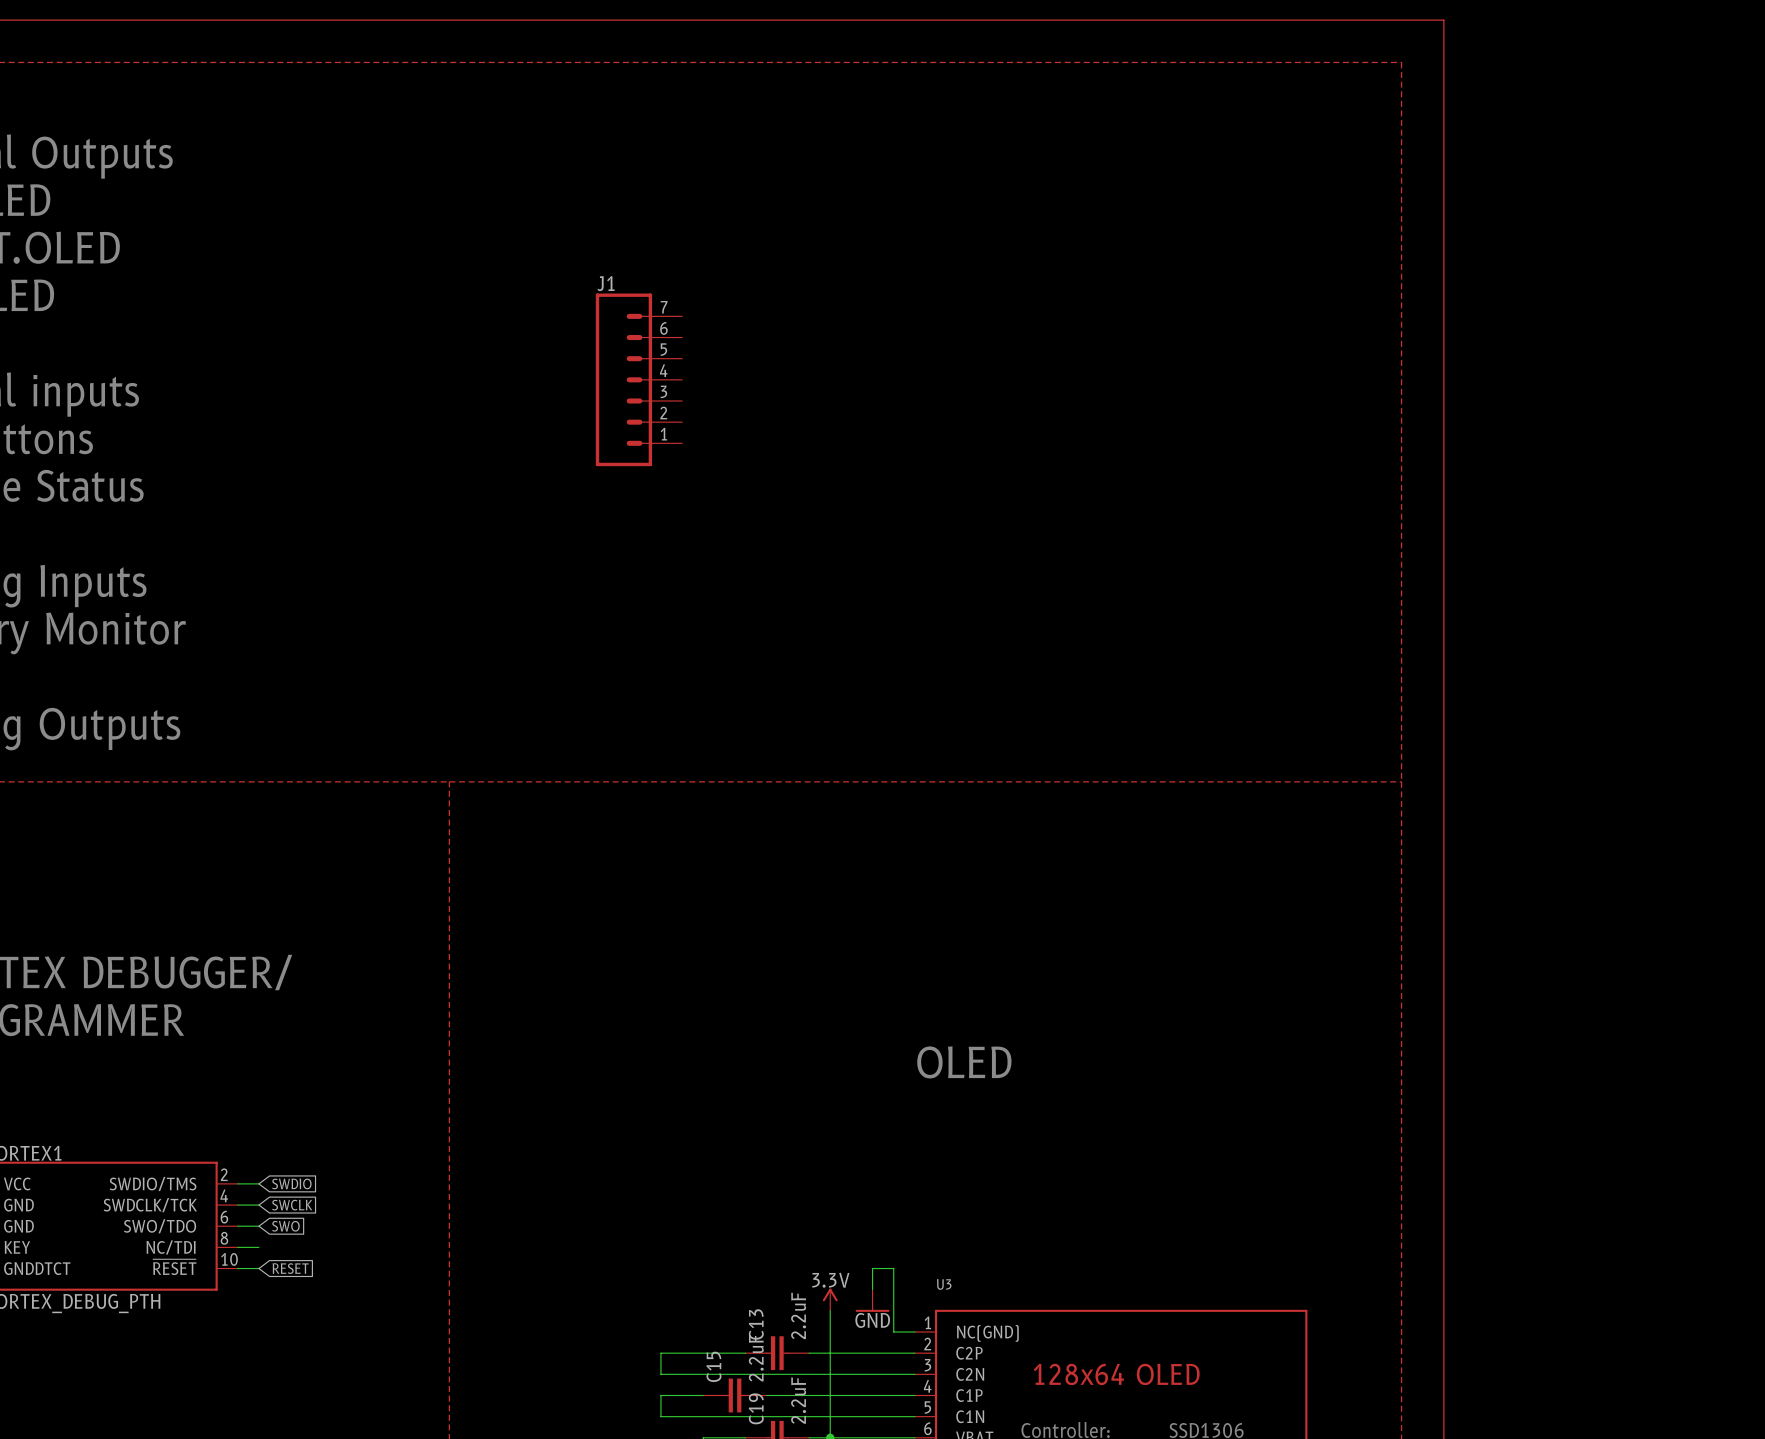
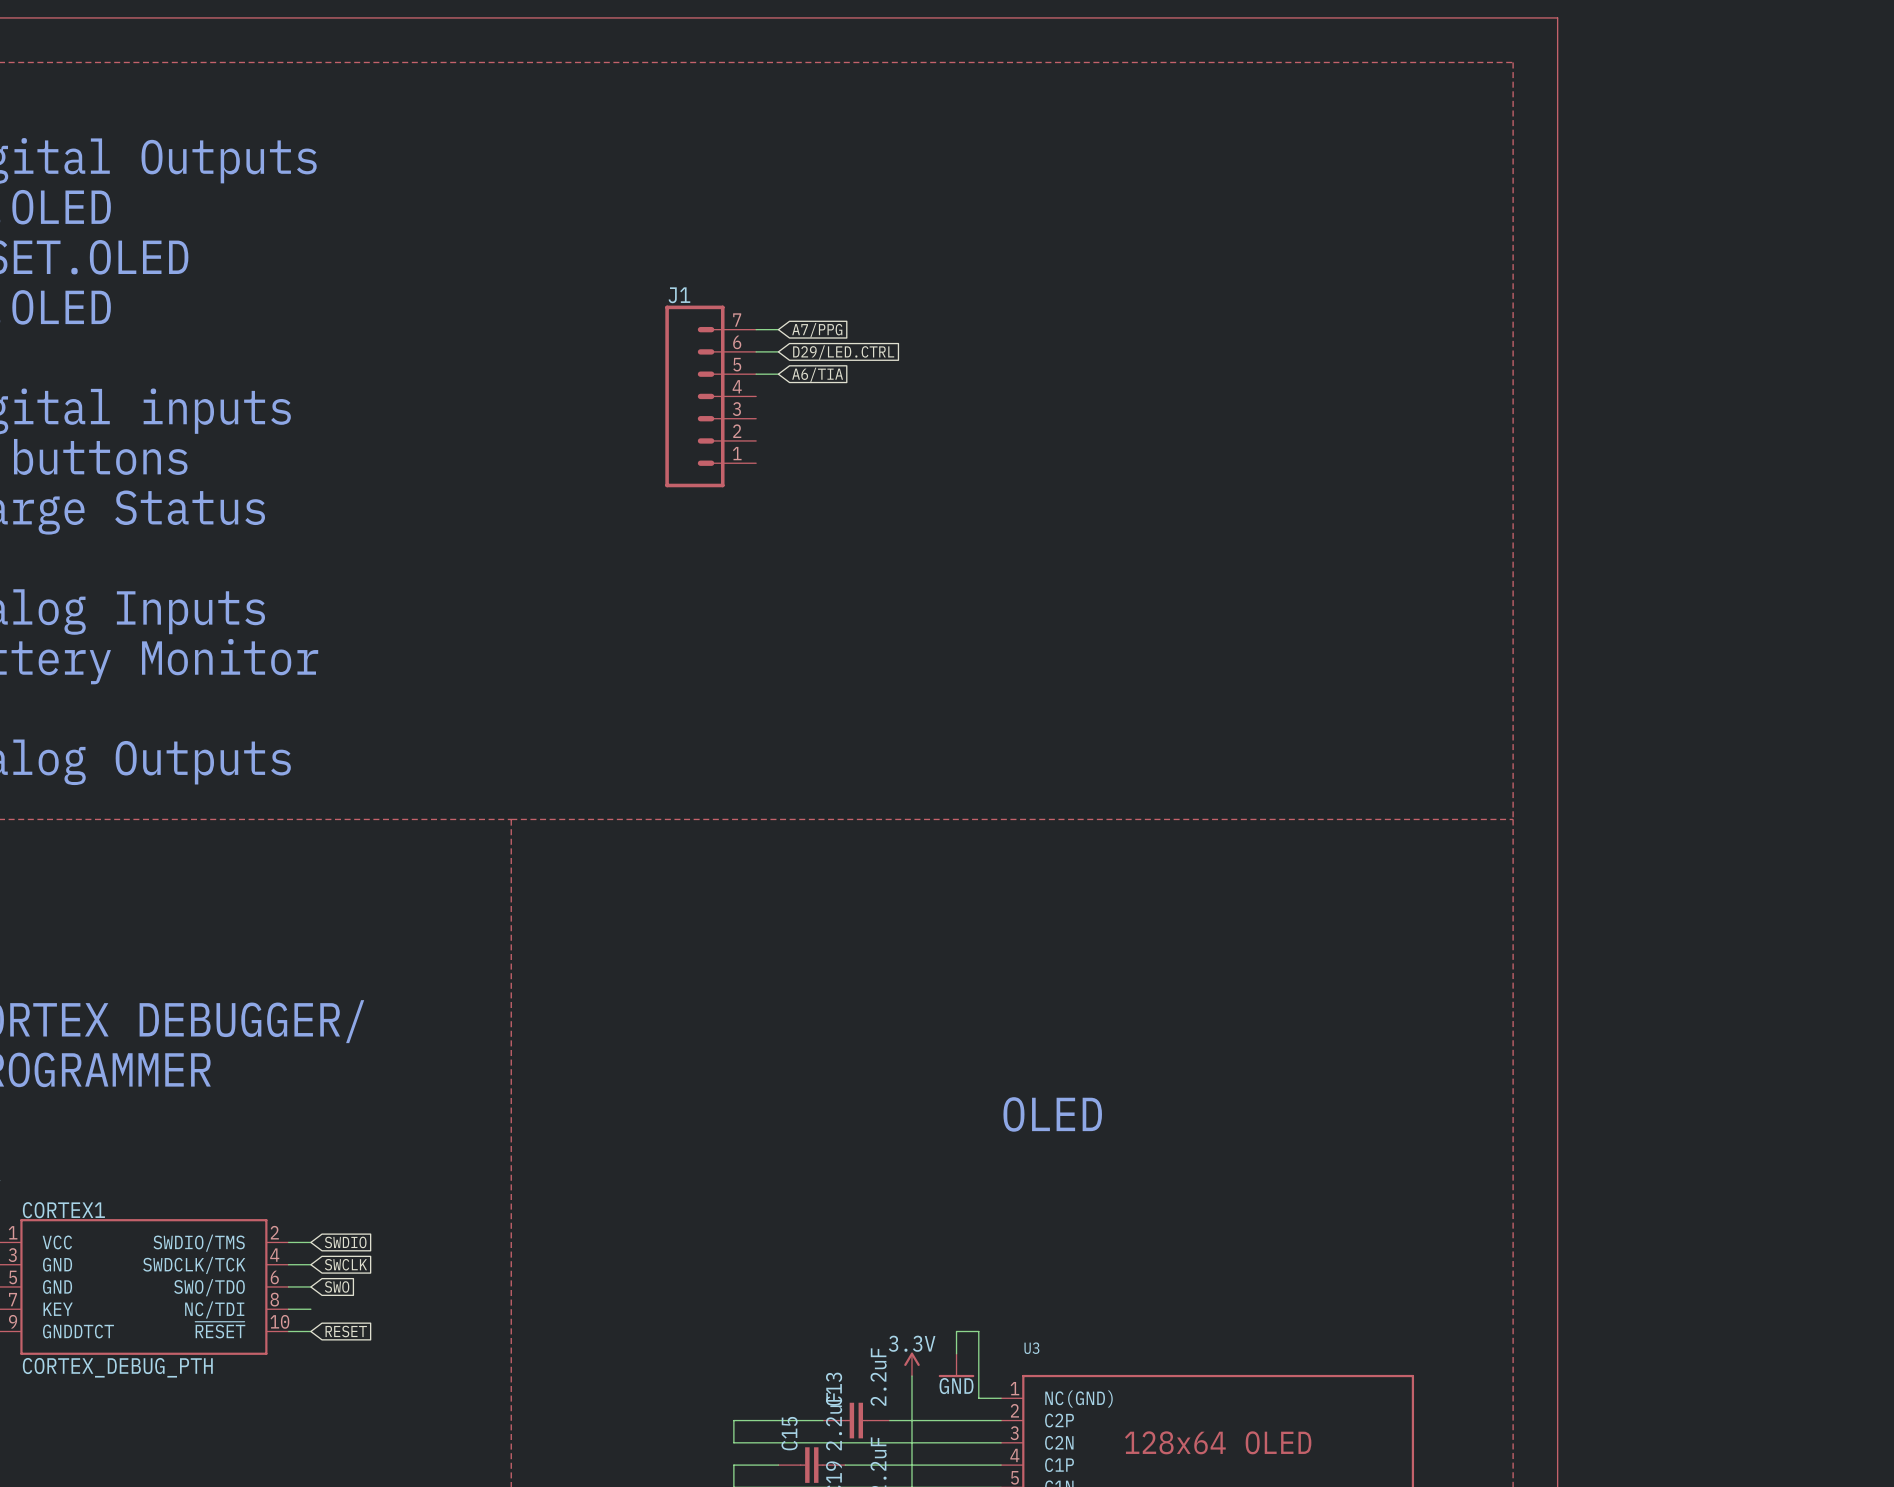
wire: none -> (756, 329) (778, 329)
global label: none -> A7/PPG (817, 330)
wire: none -> (756, 351) (778, 351)
global label: none -> D29/LED.CTRL (843, 352)
wire: none -> (756, 374) (778, 374)
global label: none -> A6/TIA (817, 374)

